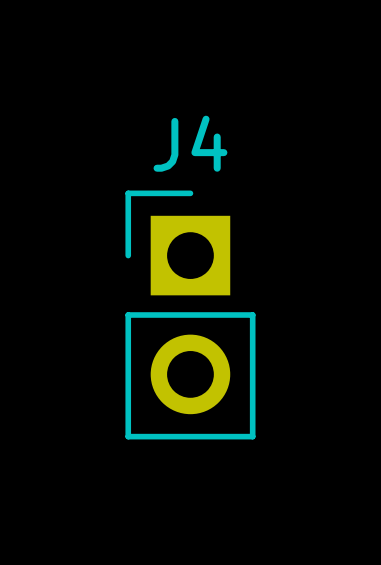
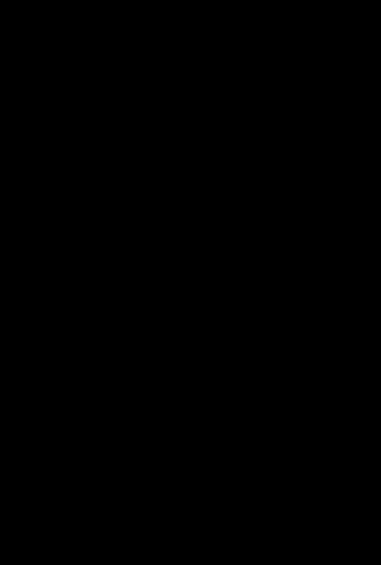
J4: (190, 314) -> none

